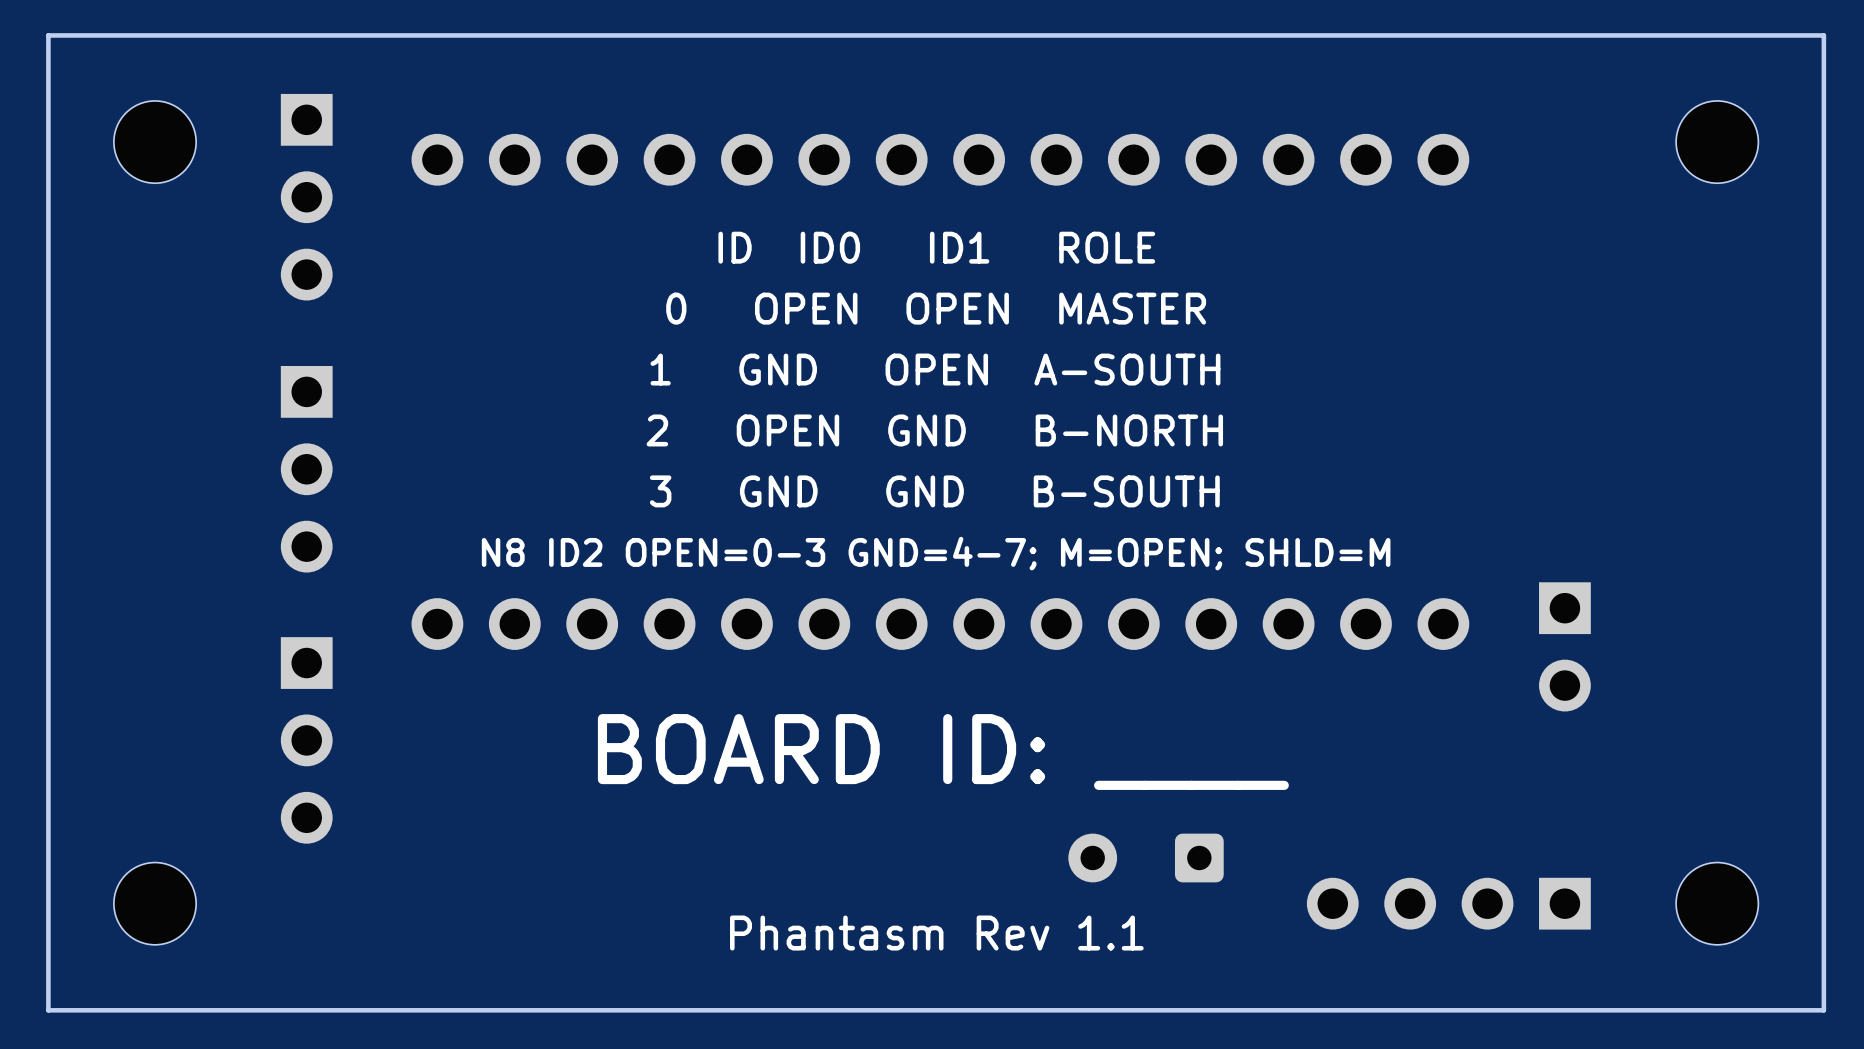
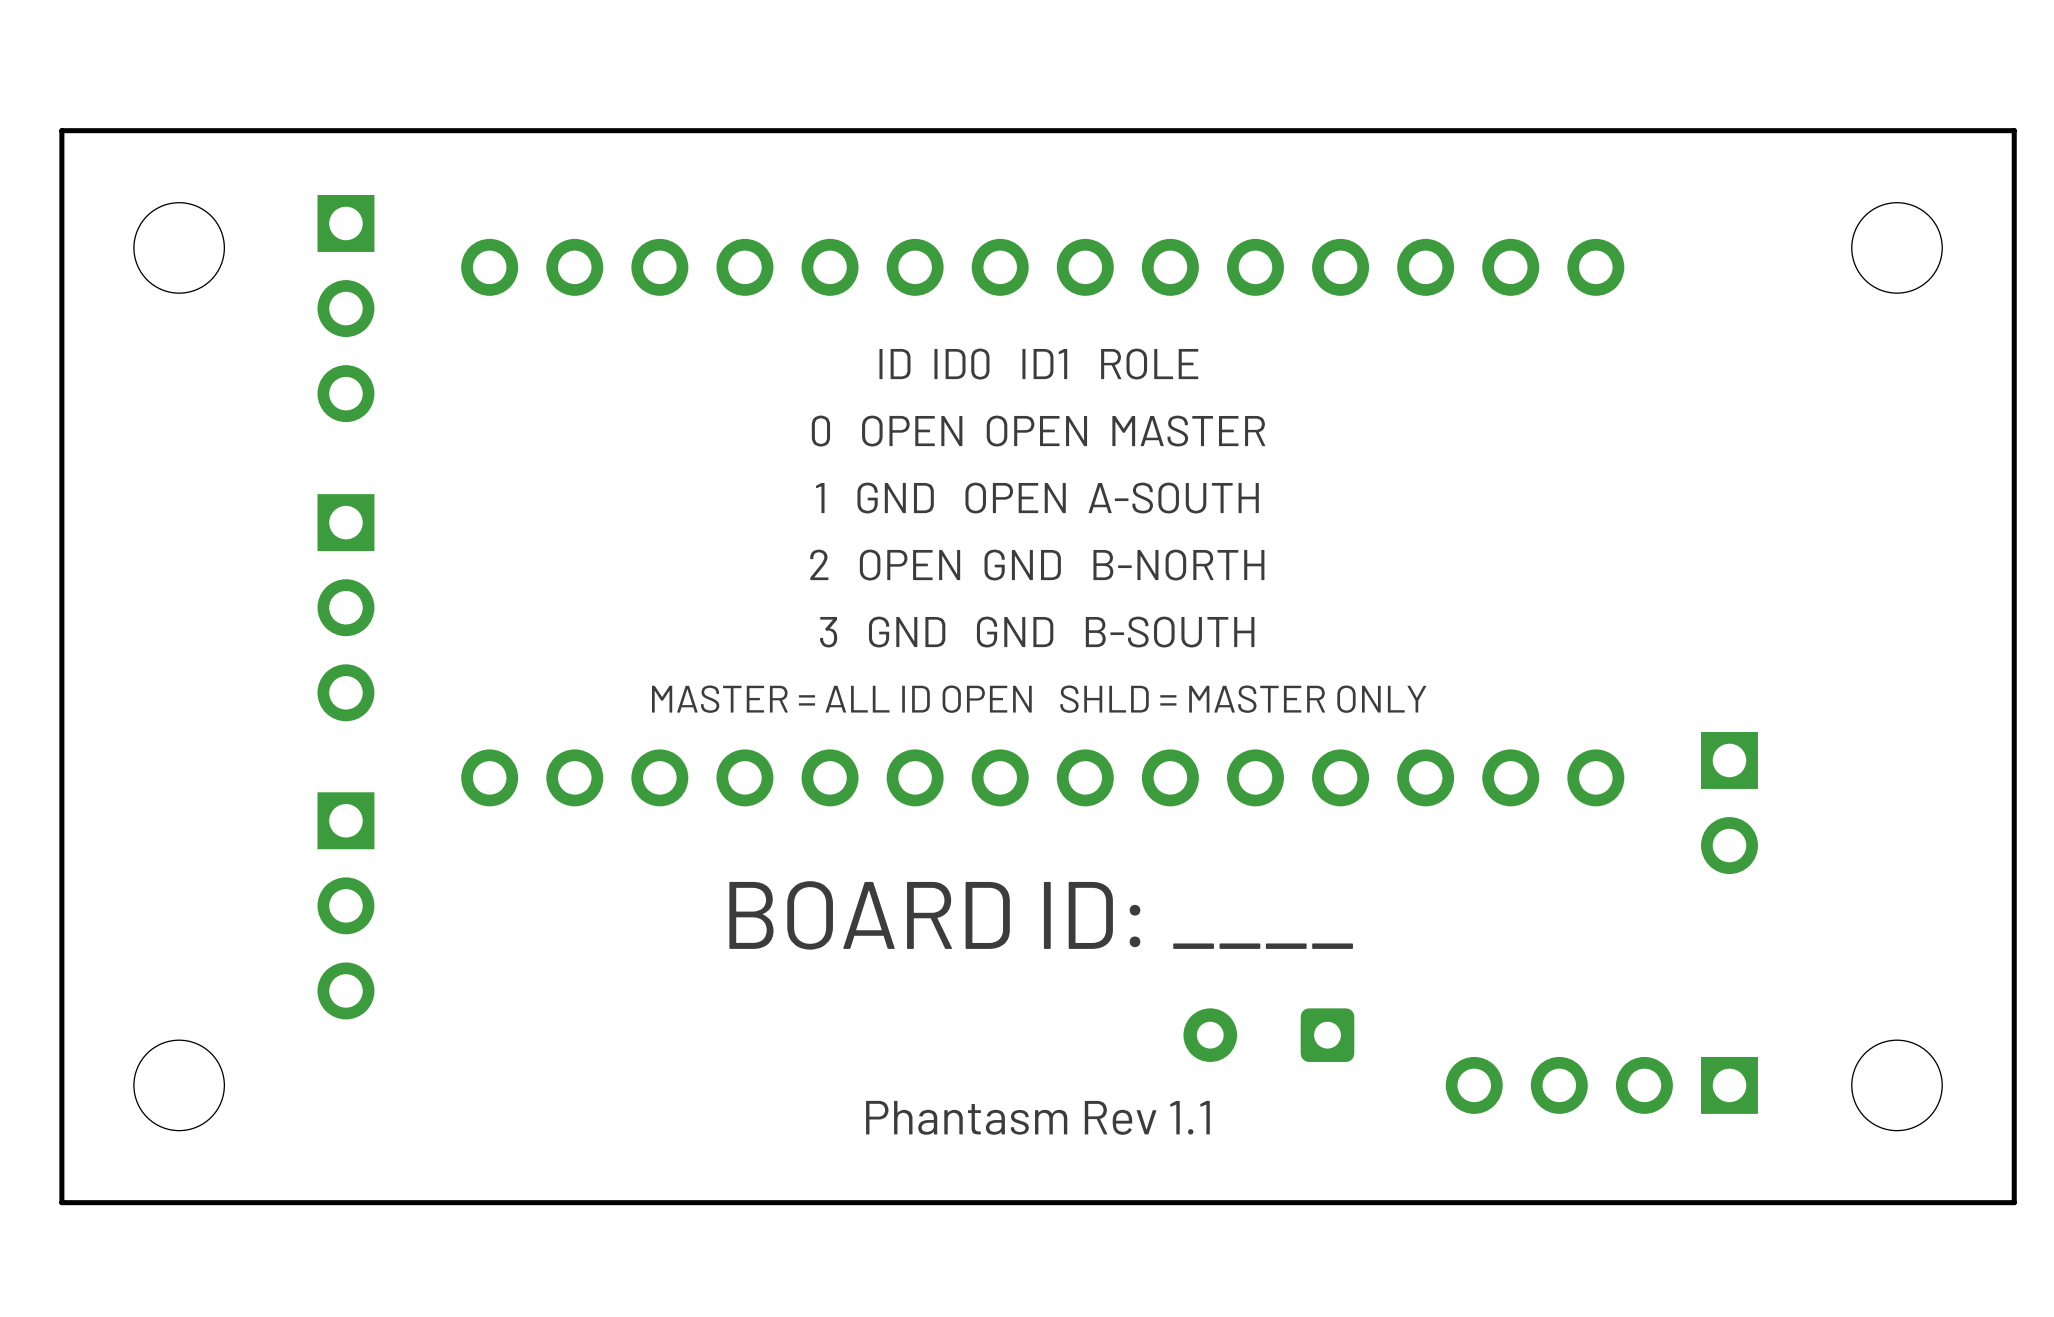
text: N8 ID2 OPEN=0-3 GND=4-7; M=OPEN; SHLD=M (936, 553) -> MASTER = ALL ID OPEN SHLD = MASTER ONLY (1039, 699)

